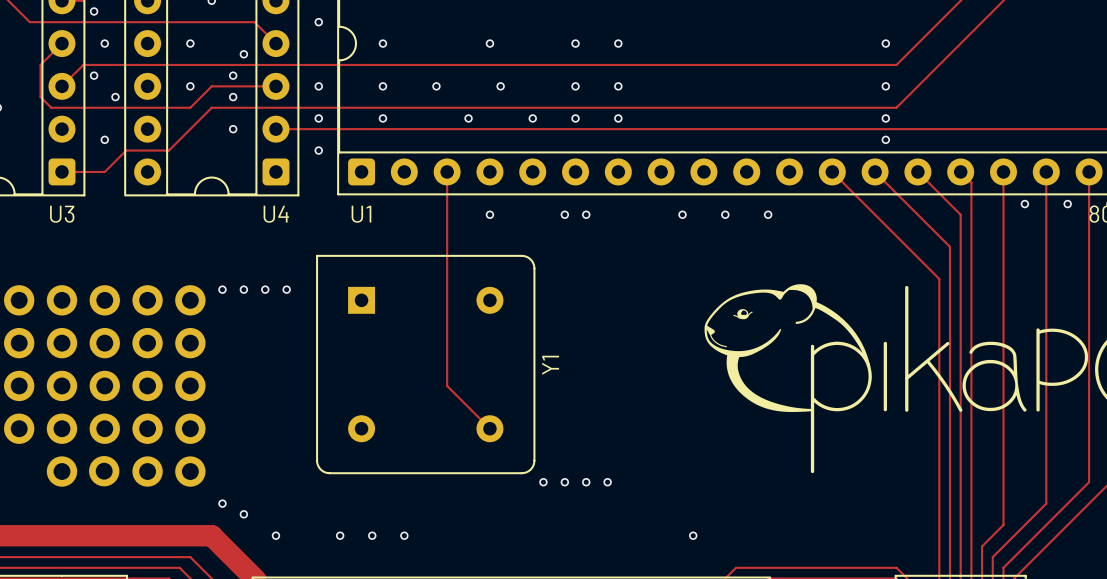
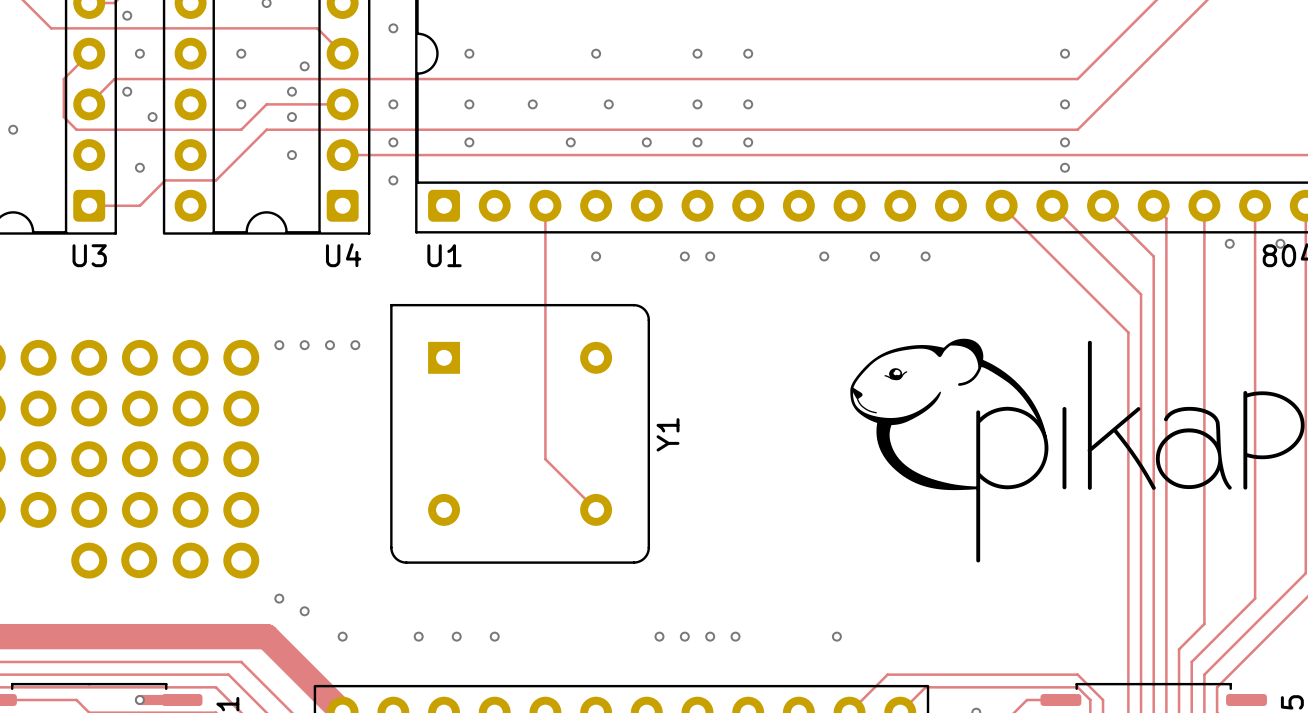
via: (543, 482) -> none
via: (564, 482) -> none
via: (586, 482) -> none
via: (607, 482) -> none
via: none -> (659, 636)
via: none -> (684, 636)
via: none -> (710, 636)
via: none -> (735, 636)

